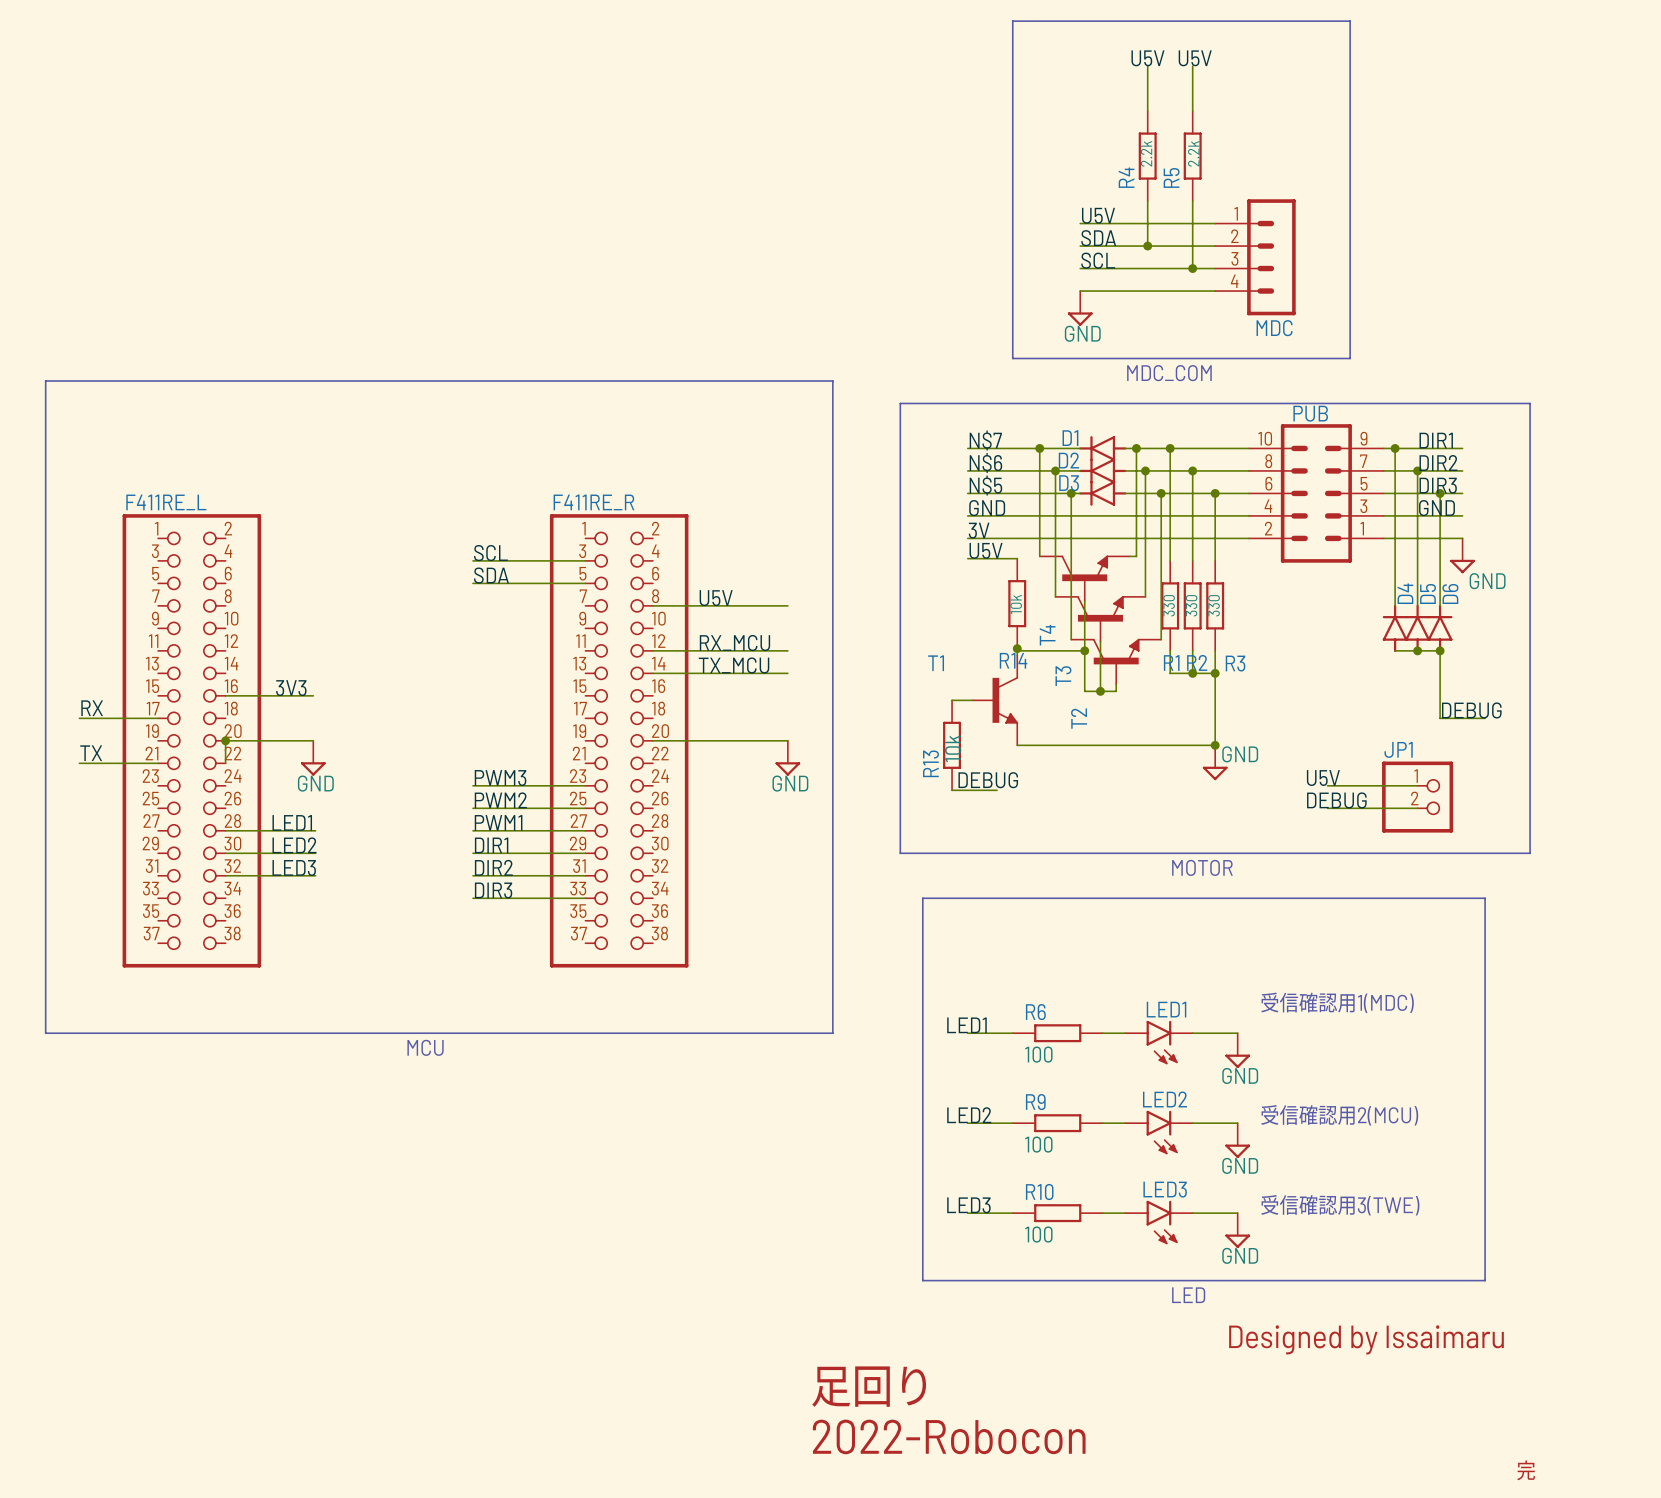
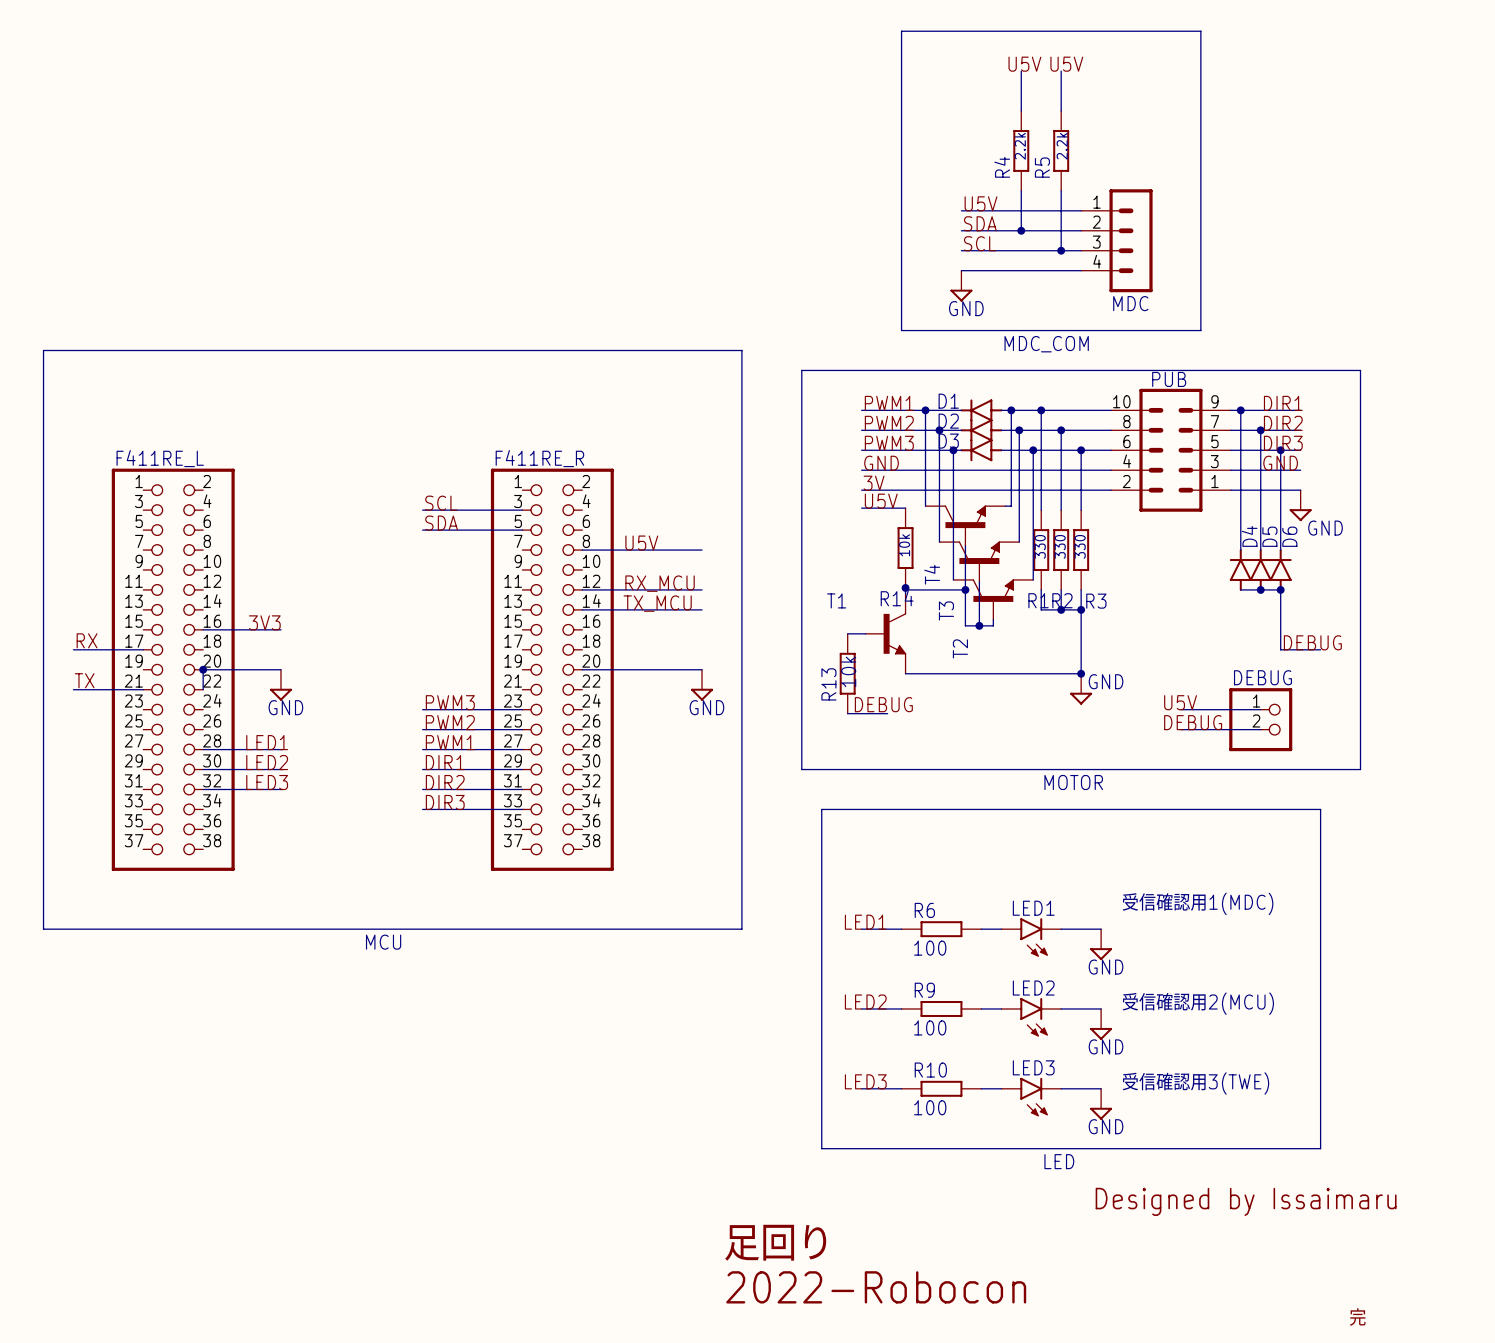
label: N$7 (985, 440) -> PWM1 (889, 403)
label: N$6 (985, 463) -> PWM2 (889, 423)
label: N$5 (985, 485) -> PWM3 (889, 443)
JP1 name: JP1 (1398, 749) -> DEBUG (1262, 677)

